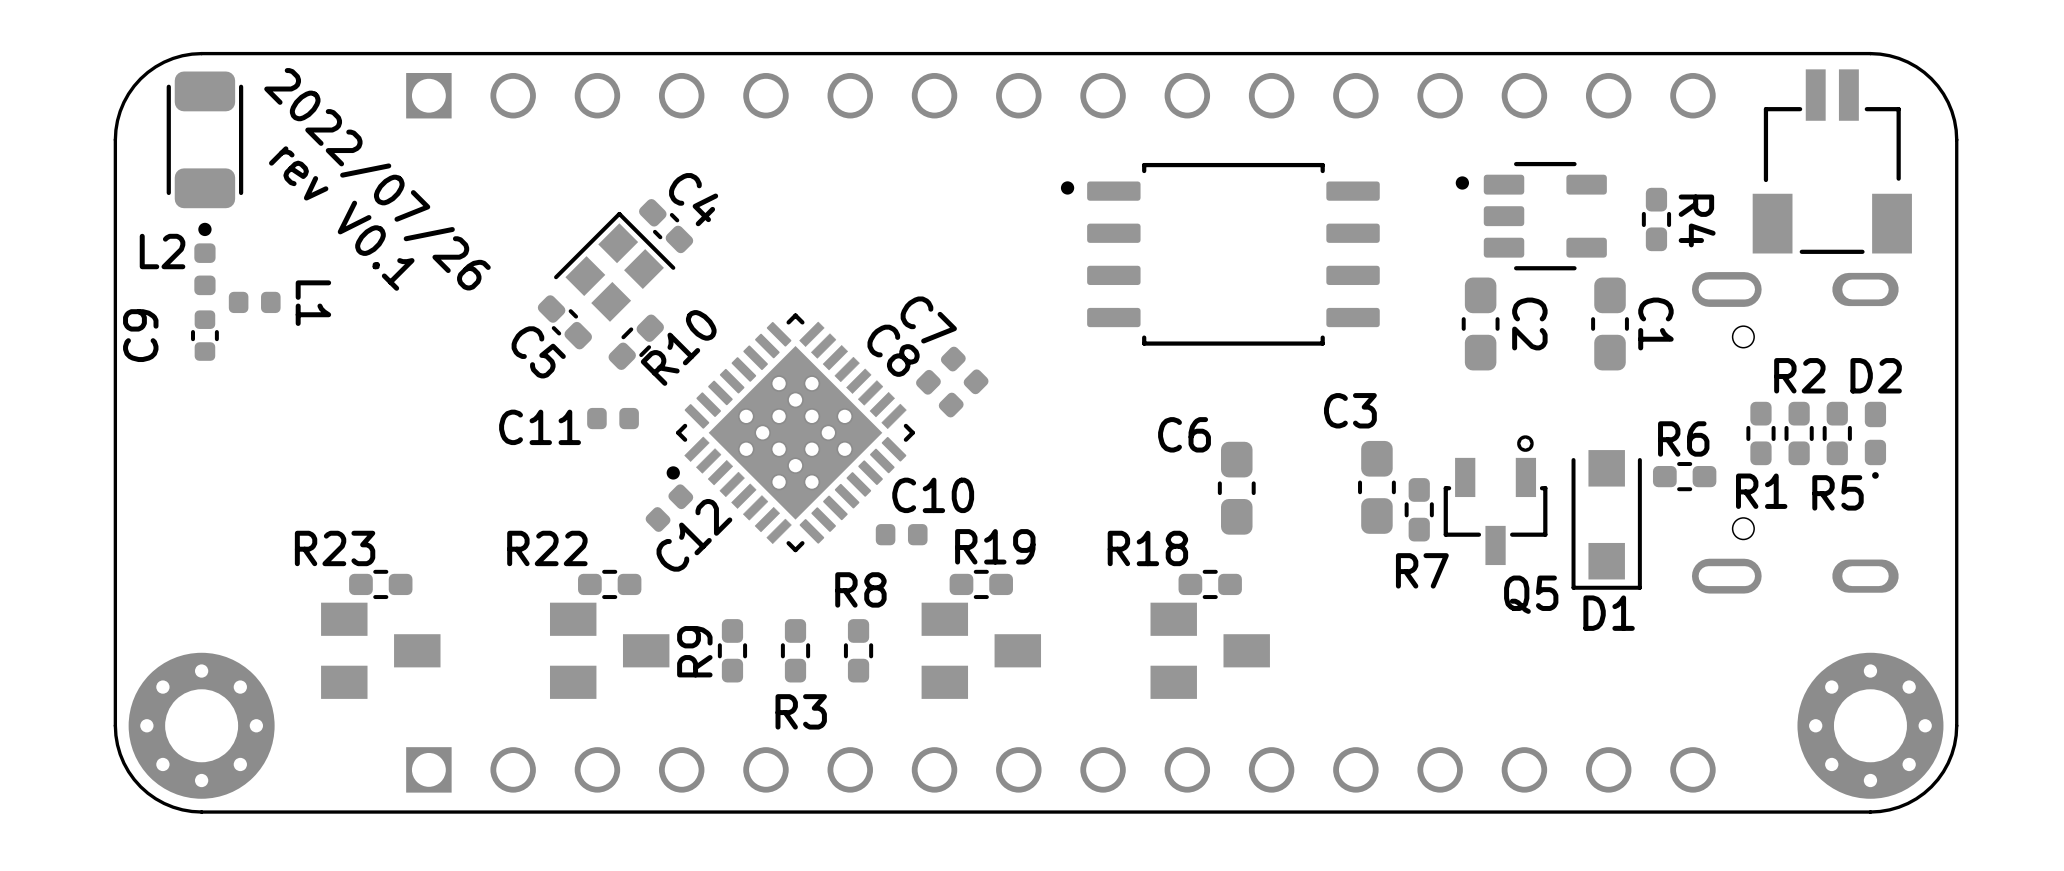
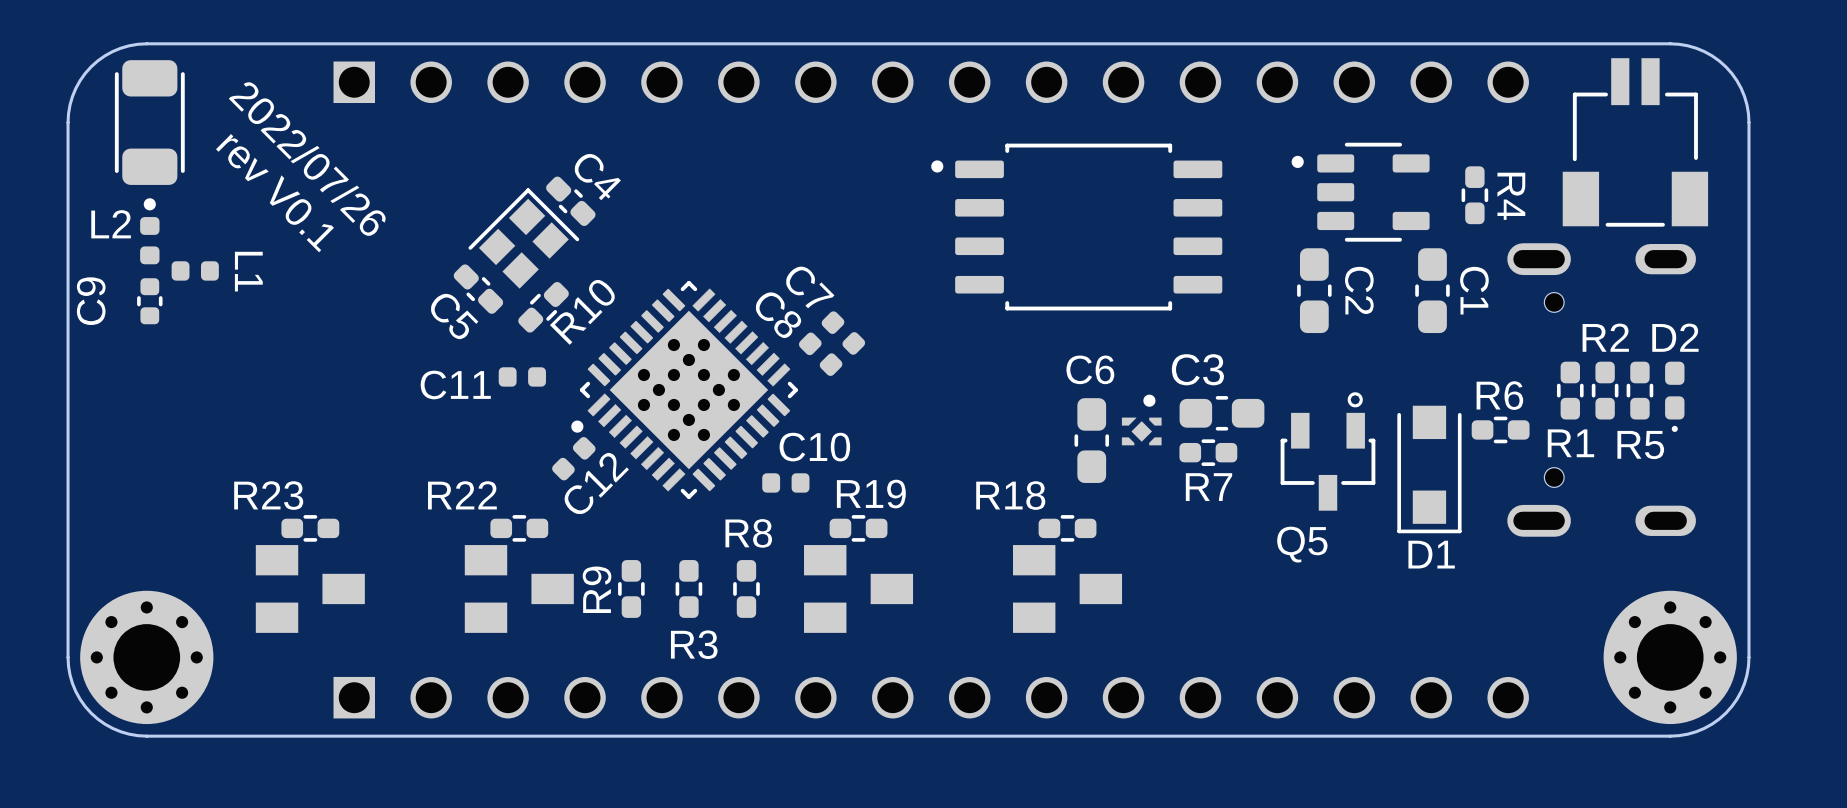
C6 name position: C6 (1184, 434) -> C6 (1090, 369)
part: none -> (1141, 419)
C3 rotation: 0° (1376, 487) -> 90° clockwise (1221, 413)
R7 rotation: 0° (1419, 509) -> 90° clockwise (1208, 452)
R7 position: (1419, 509) -> (1208, 452)
Q5 name position: Q5 (1531, 594) -> Q5 (1302, 544)

